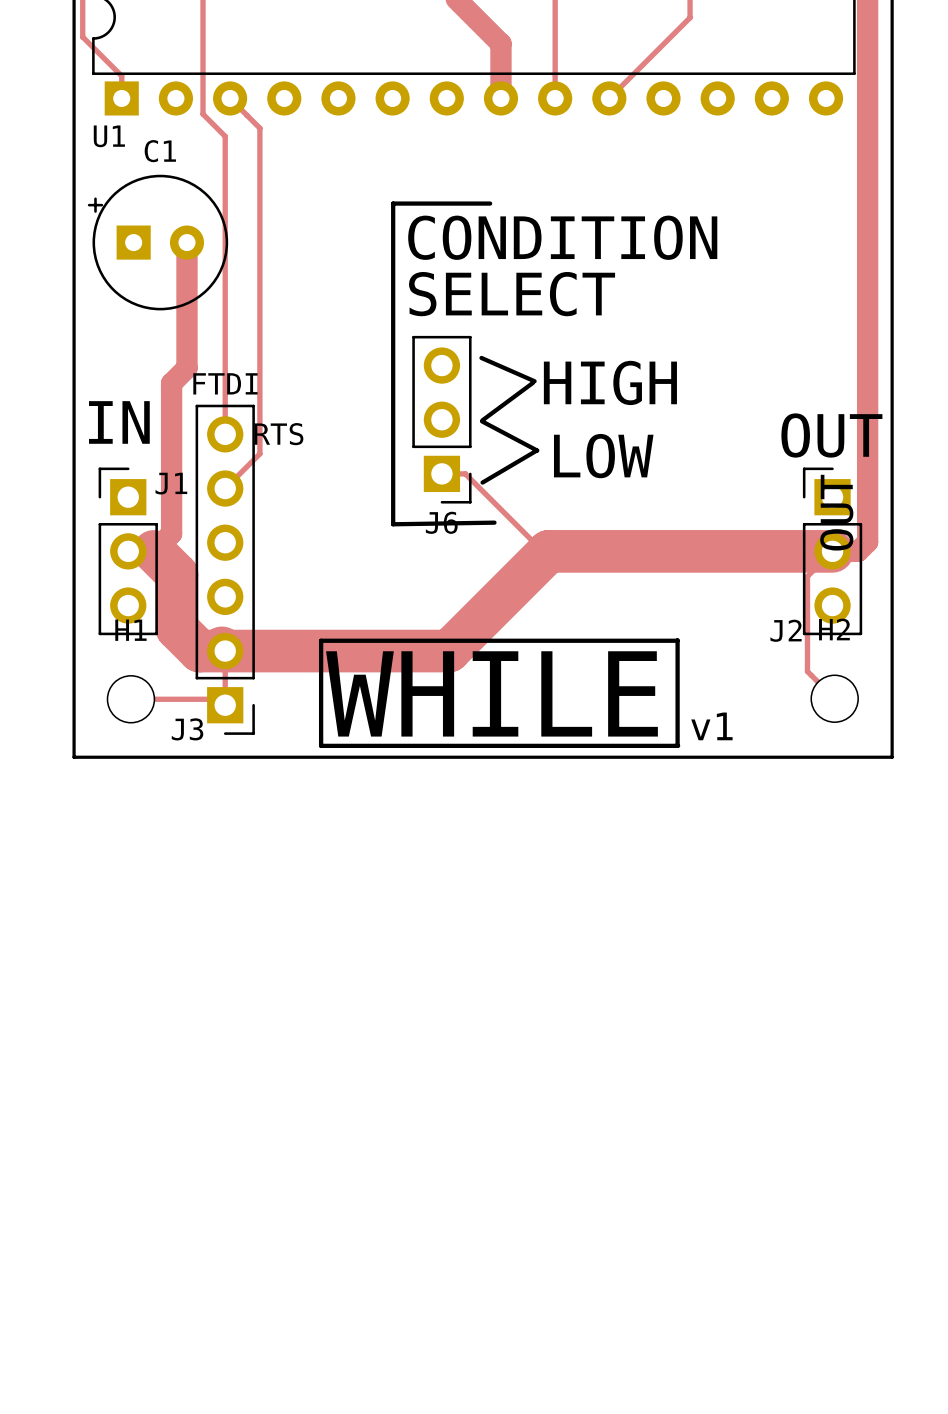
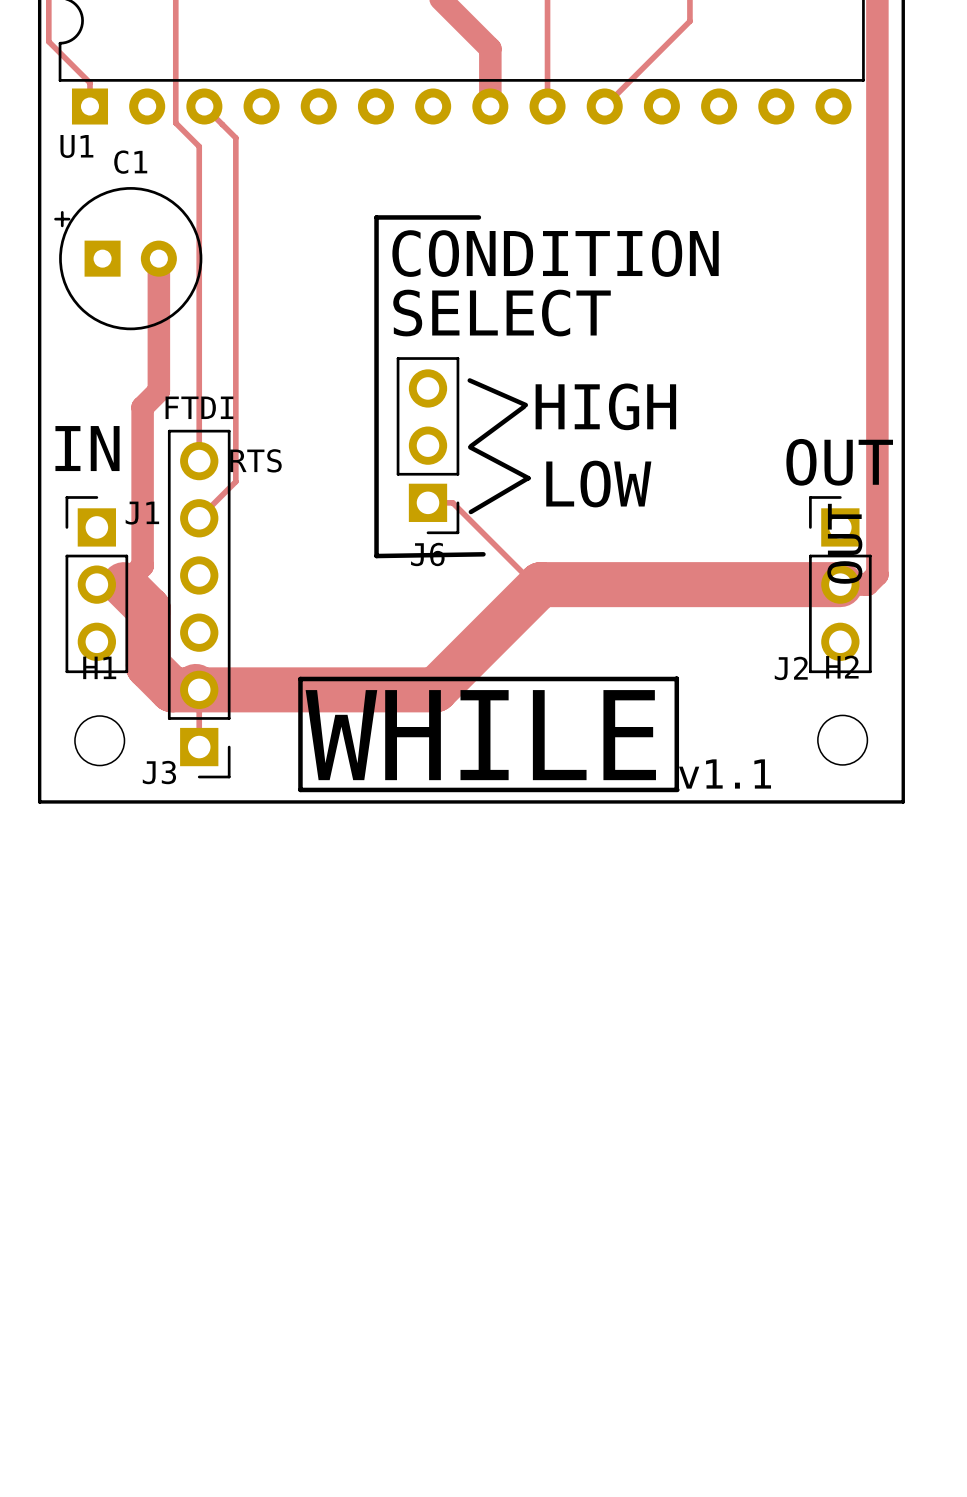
track: (832, 551) (807, 576) (807, 671) (834, 698) -> none
track: (130, 699) (219, 699) (225, 705) -> none
text: v1 (711, 726) -> v1.1 (725, 773)

